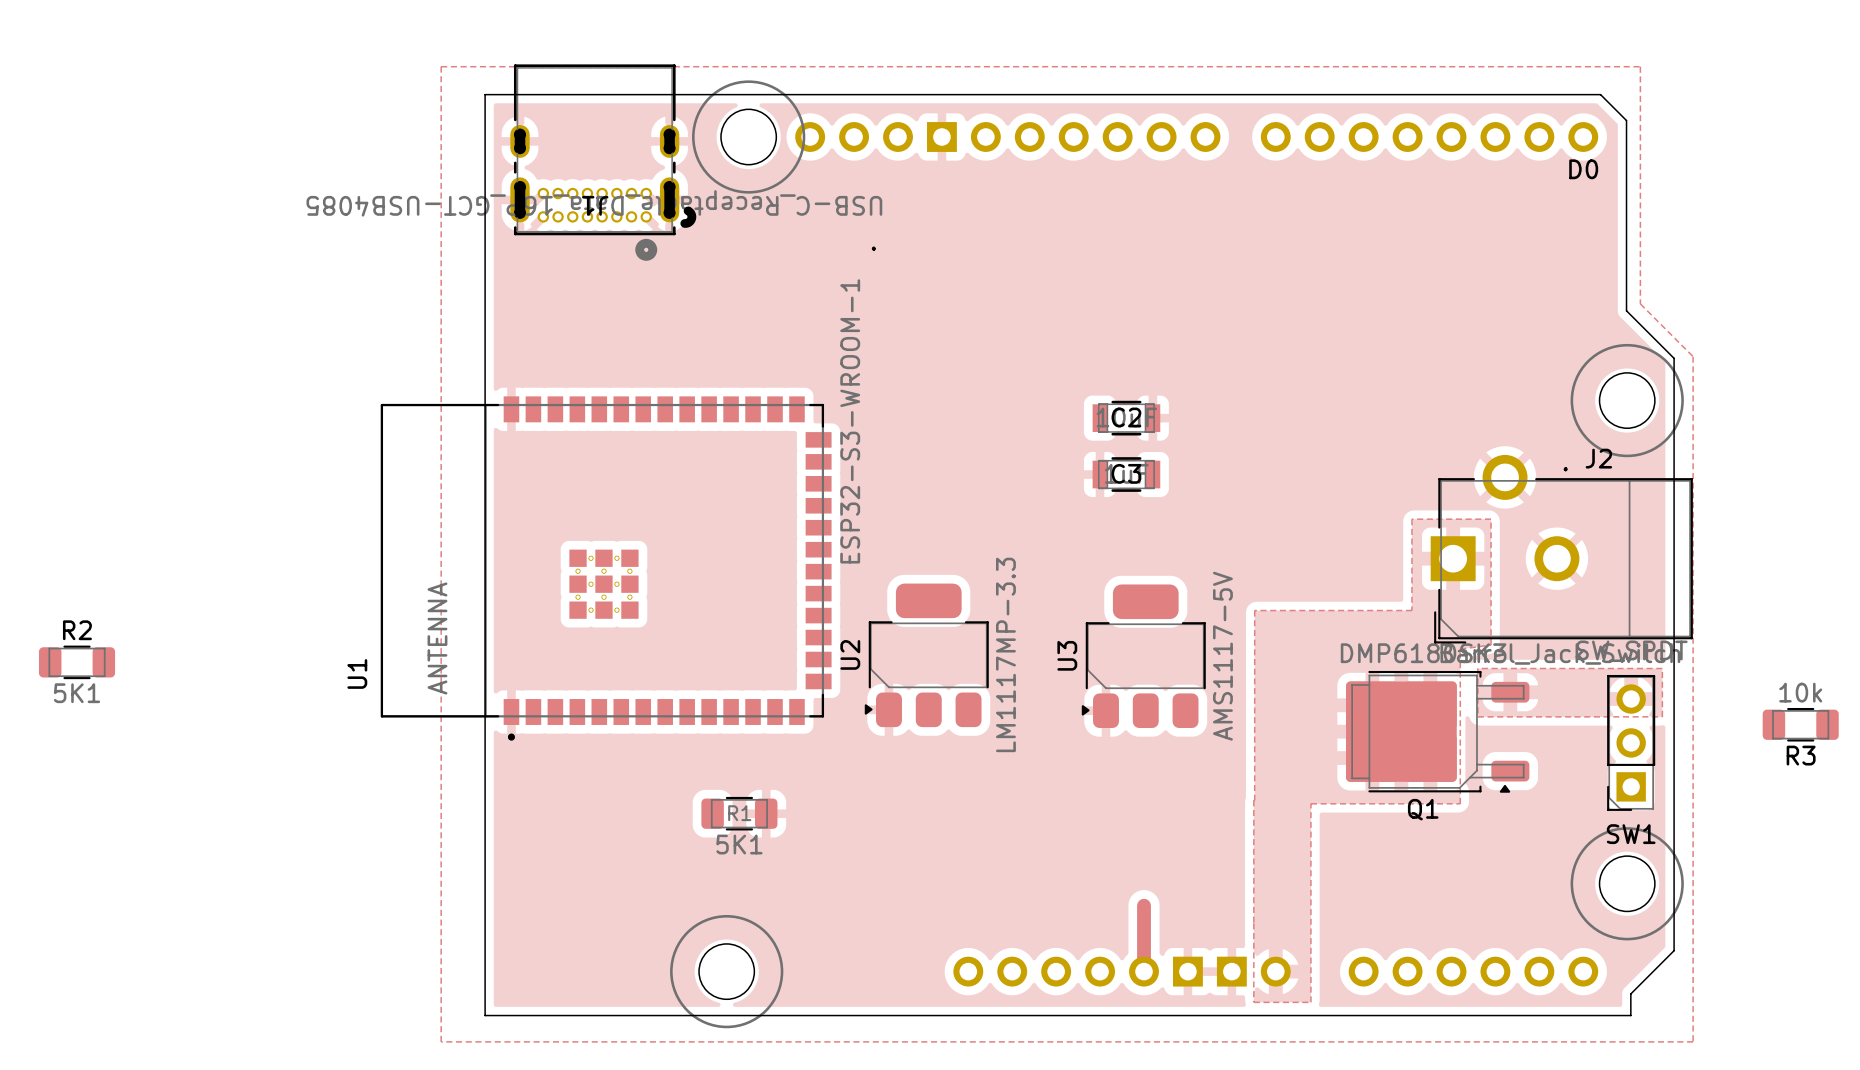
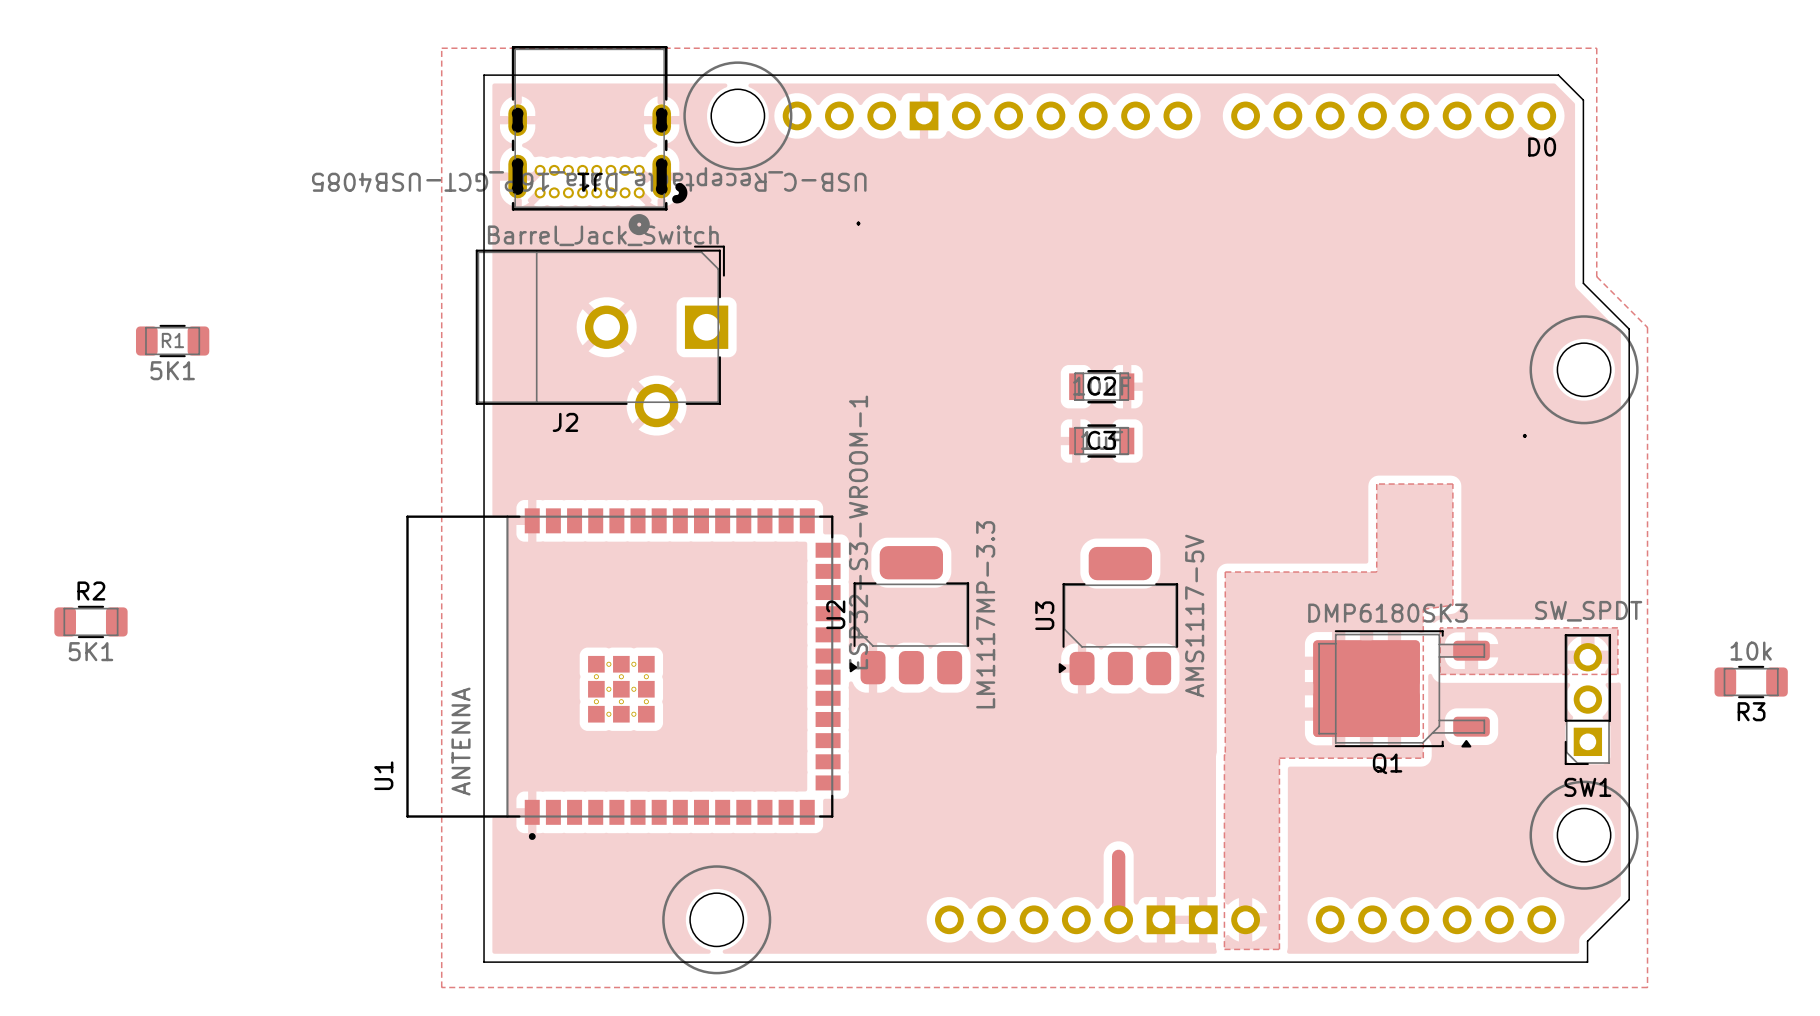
J2 rotation: 0° (1561, 549) -> 180° (602, 336)
J2 position: (1561, 549) -> (602, 336)
U1 position: (606, 568) -> (623, 674)
R1 position: (739, 813) -> (172, 341)

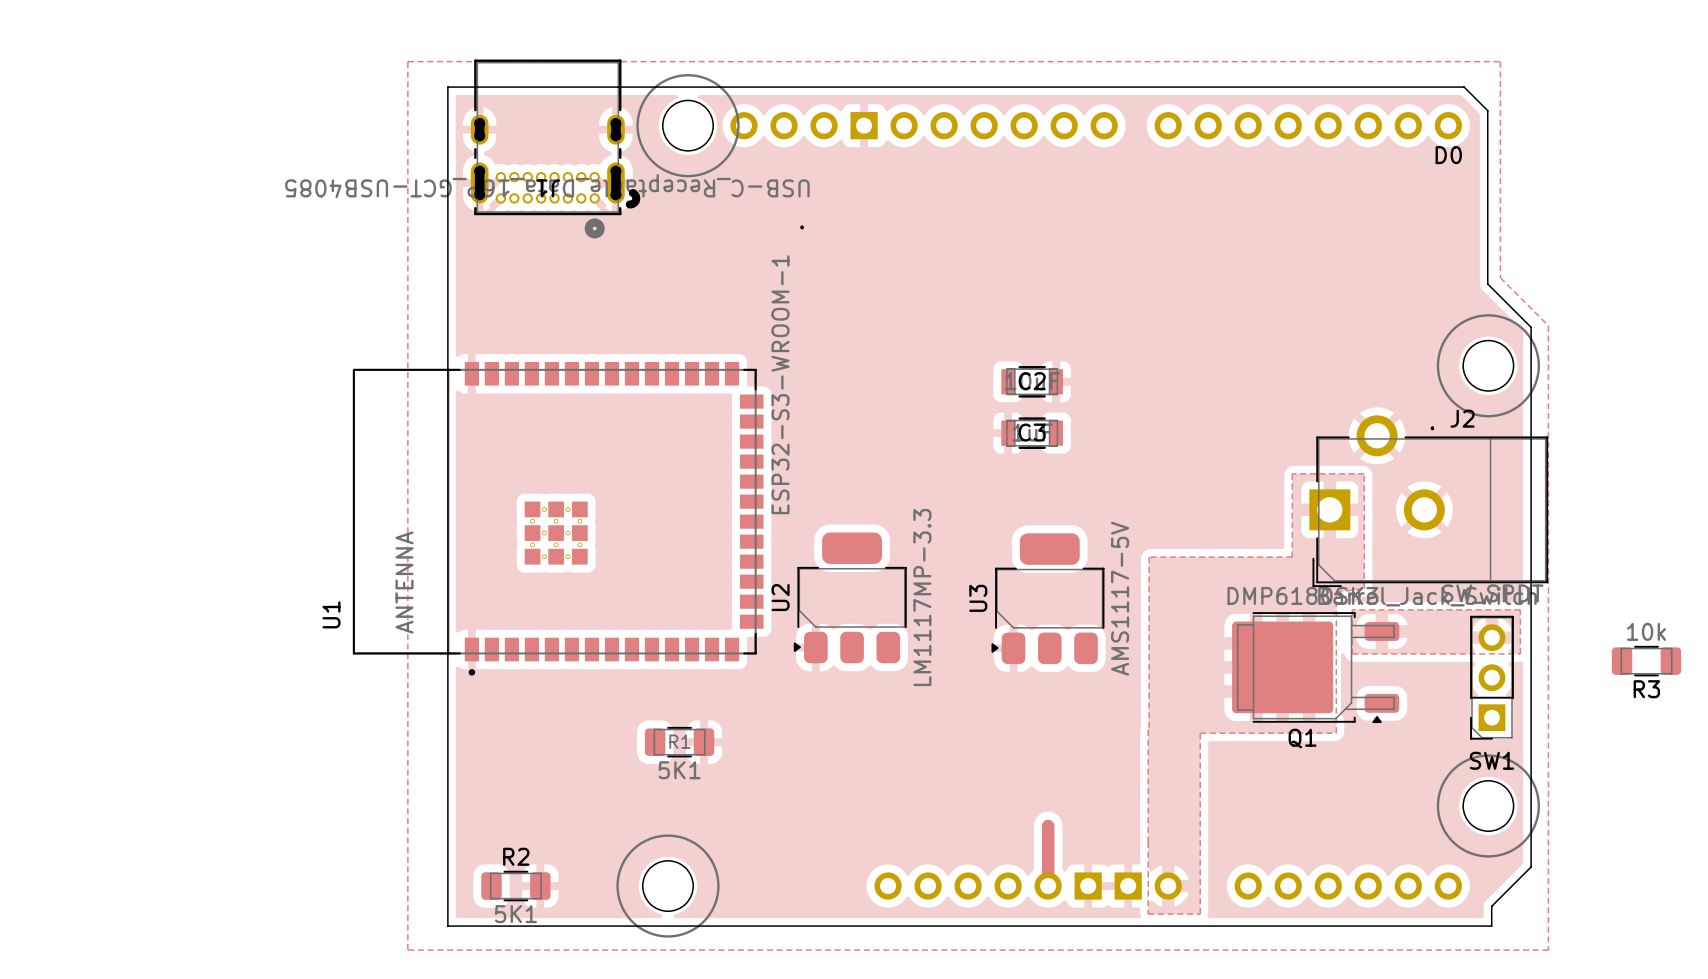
J2 rotation: 0° (602, 336) -> 180° (1428, 501)
J2 position: (602, 336) -> (1428, 501)
R1 position: (172, 341) -> (679, 742)
R2 position: (90, 621) -> (515, 886)
U1 position: (623, 674) -> (558, 518)

